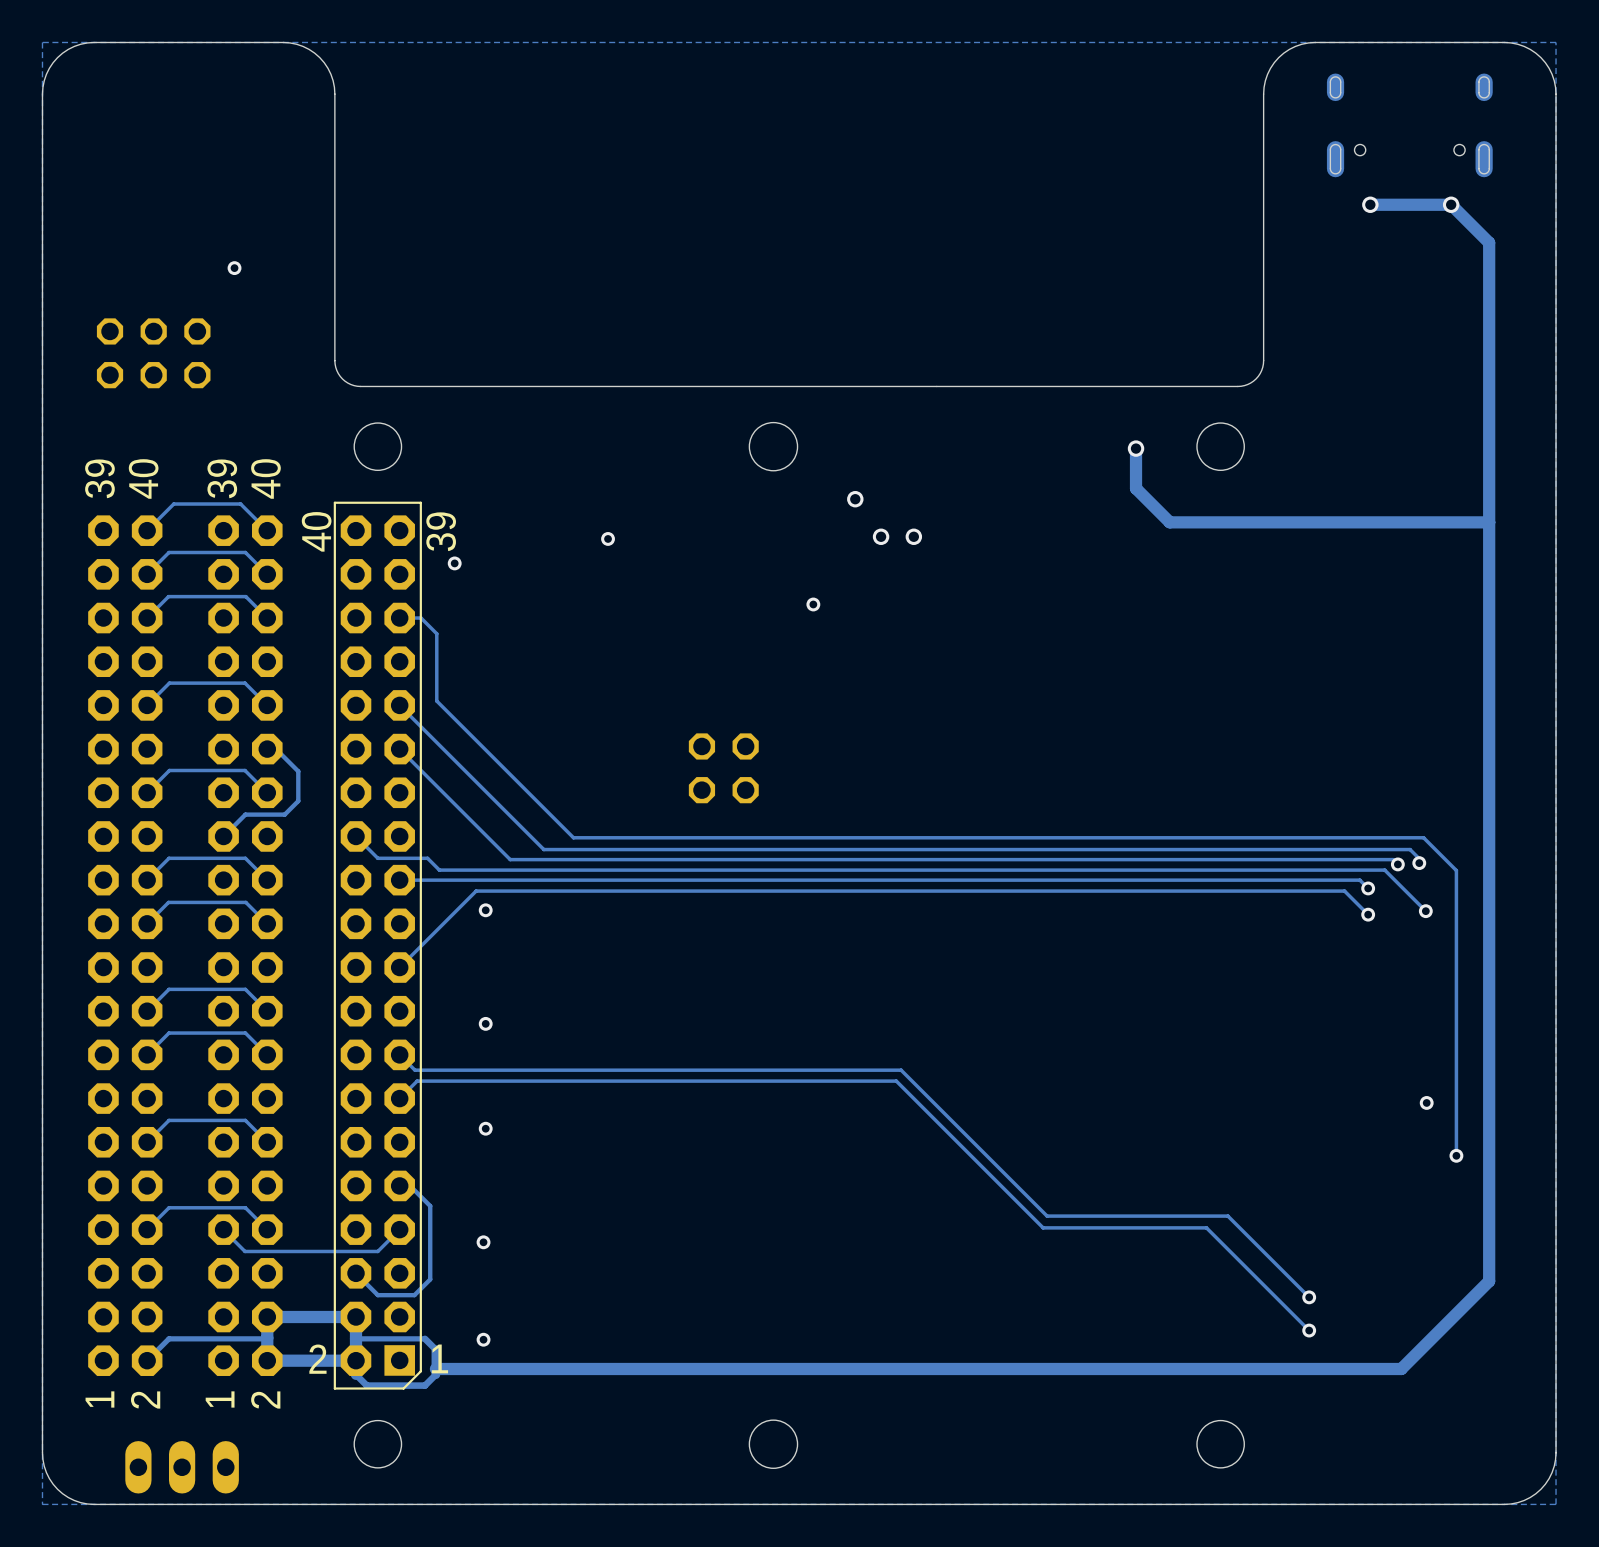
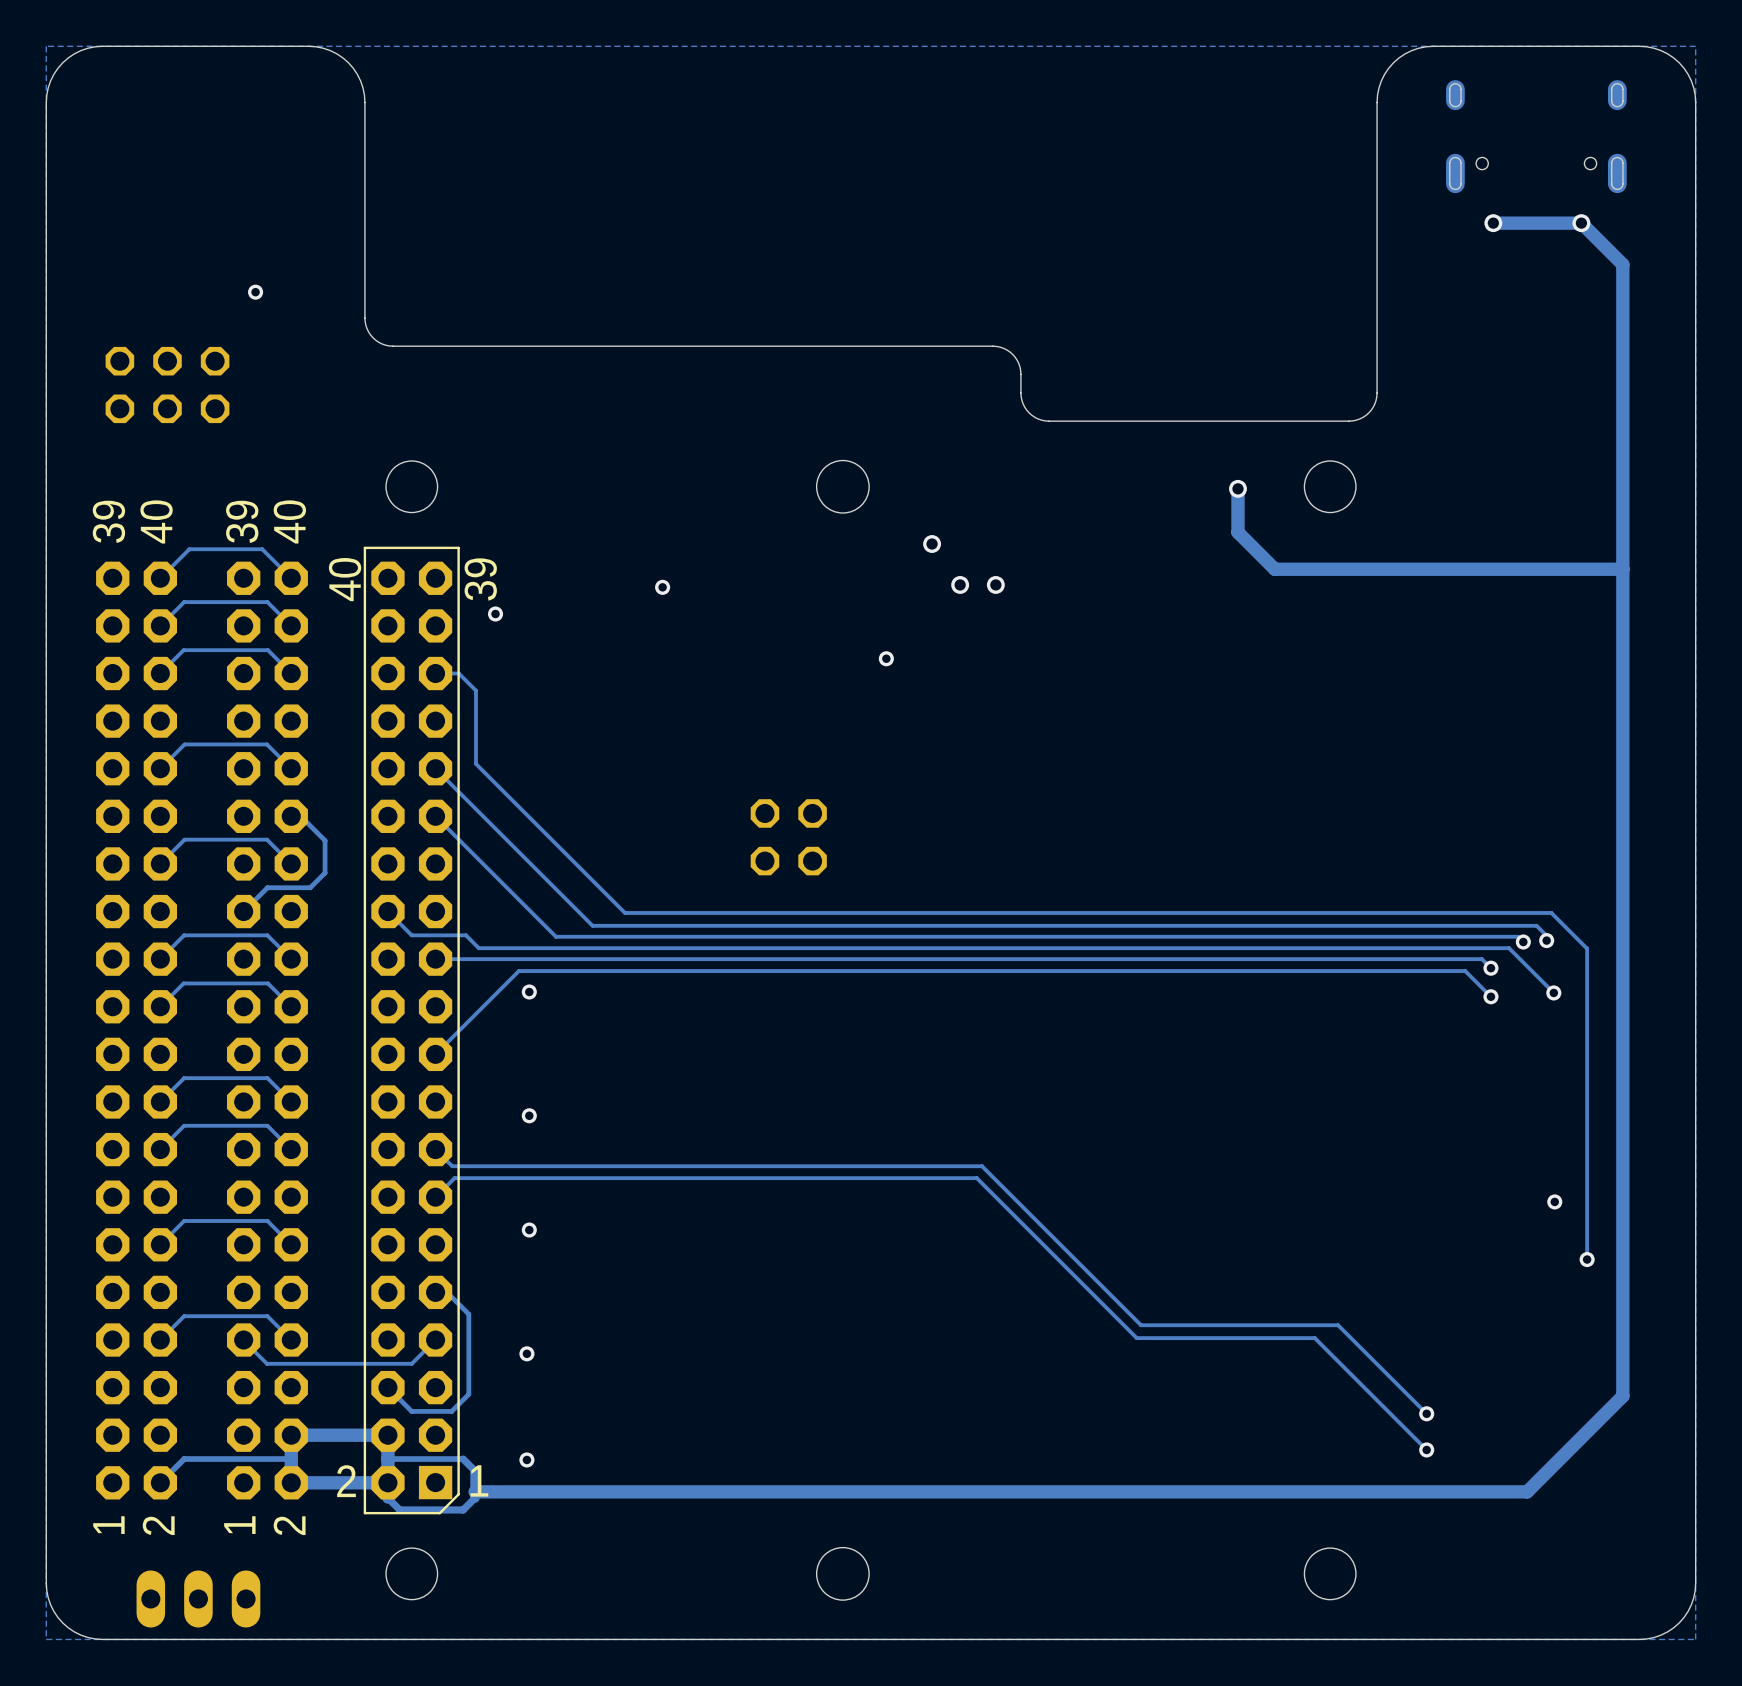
board edge: (334, 291) (335, 367) (342, 378) (357, 386) (962, 386) -> (364, 318) (367, 328) (373, 337) (382, 344) (393, 346) (996, 346) (1009, 352) (1018, 363) (1021, 396) (1026, 410) (1034, 417) (1049, 421)

